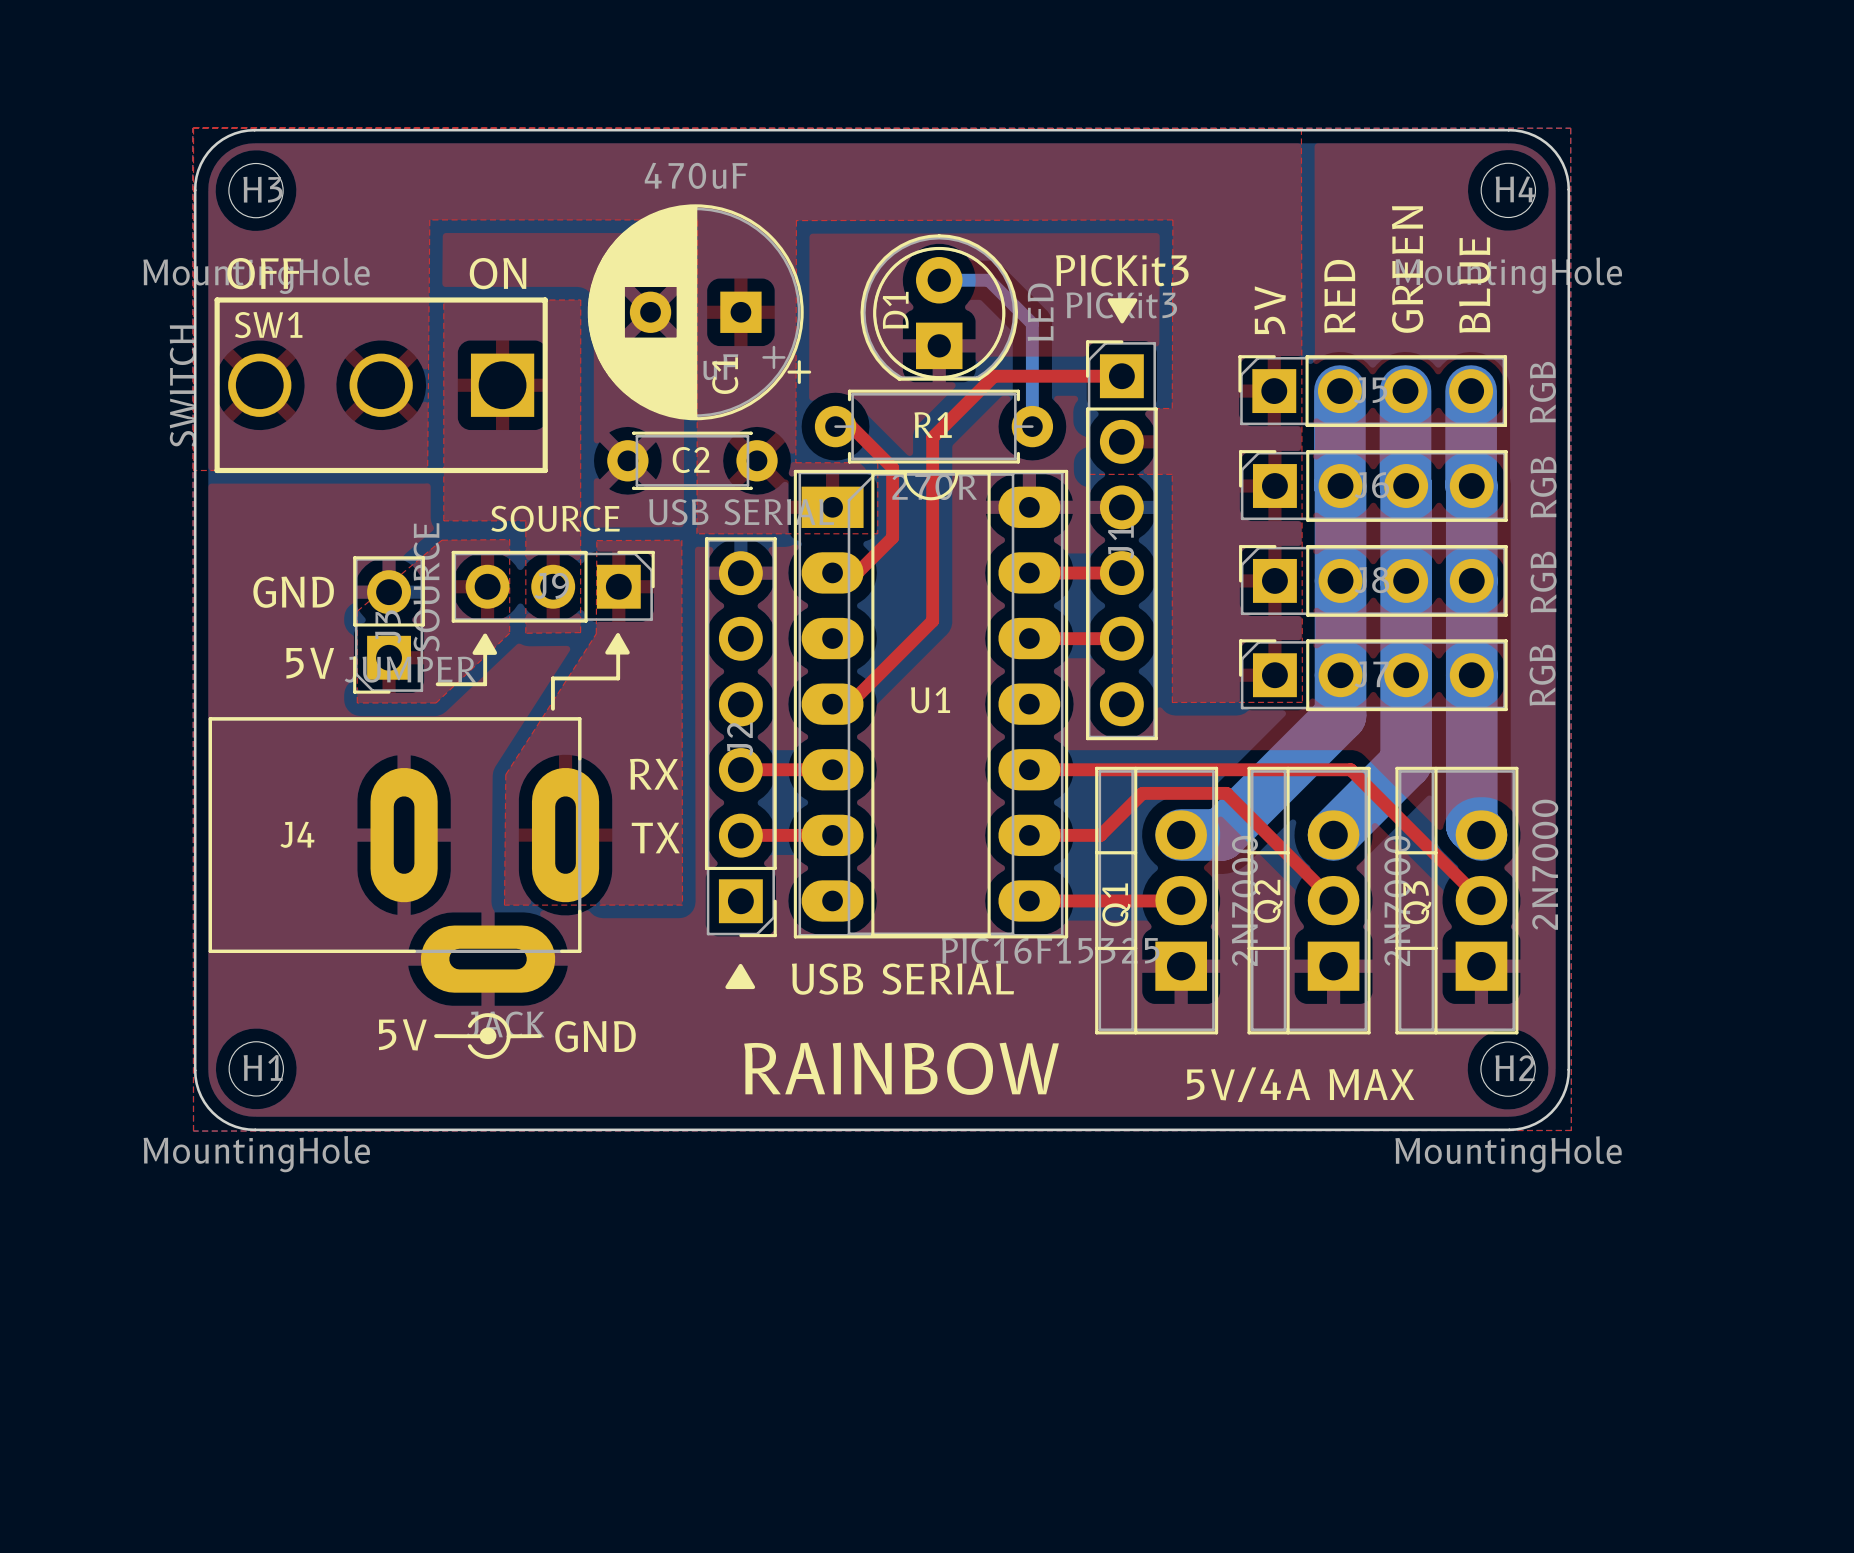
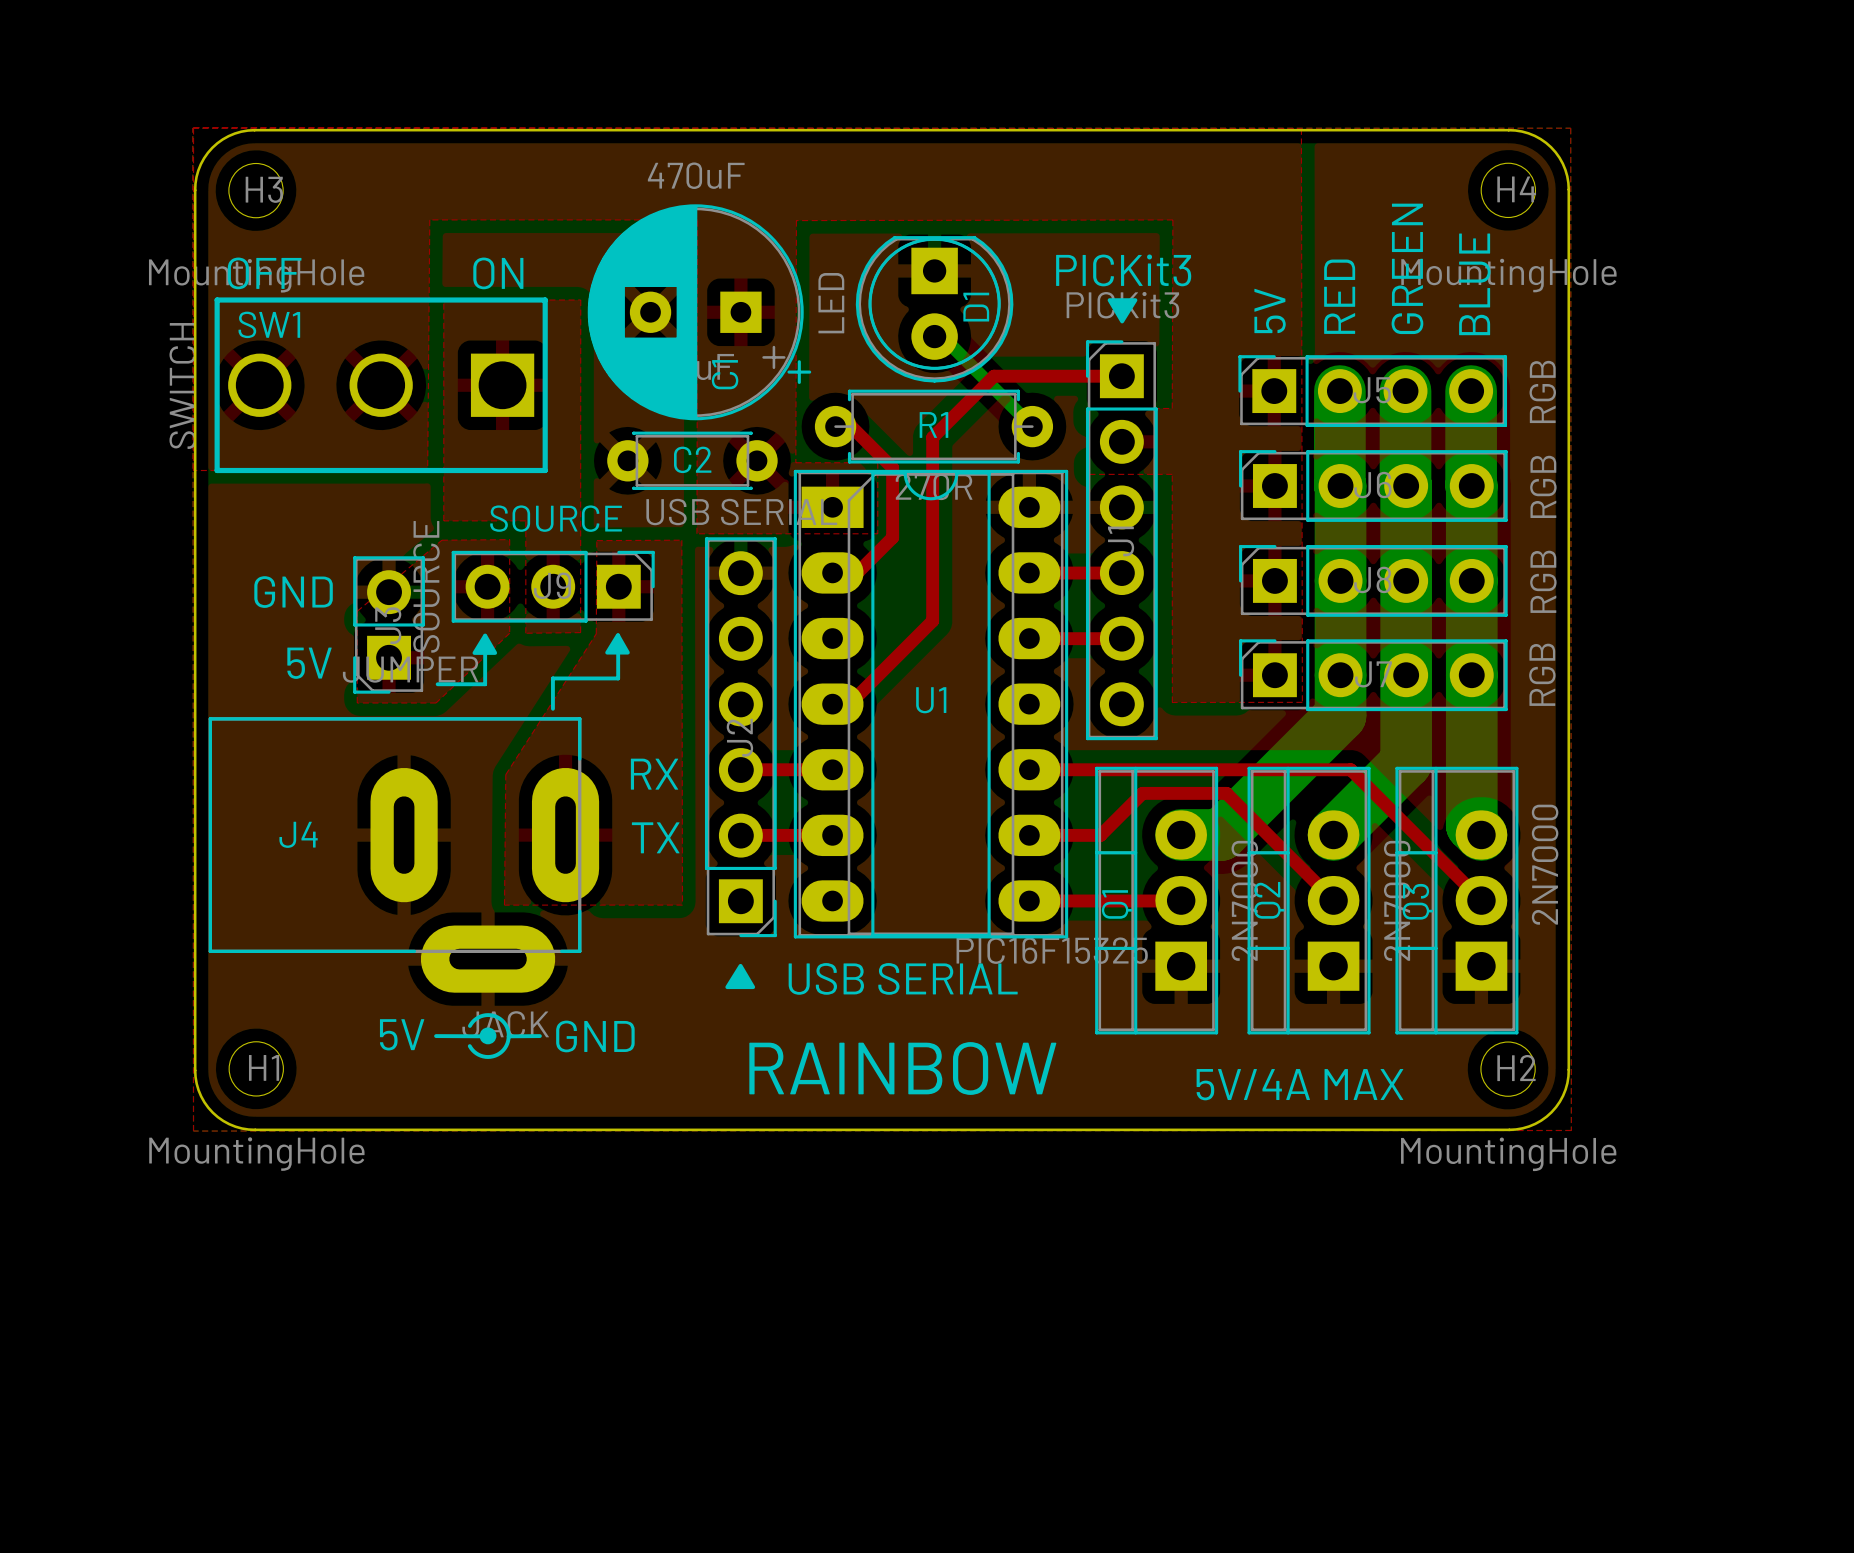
bottom track: (939, 280) (988, 280) (1032, 323) (1032, 426) -> (934, 336) (942, 336) (1032, 426)
D1 rotation: 0° (939, 307) -> 180° (934, 309)

